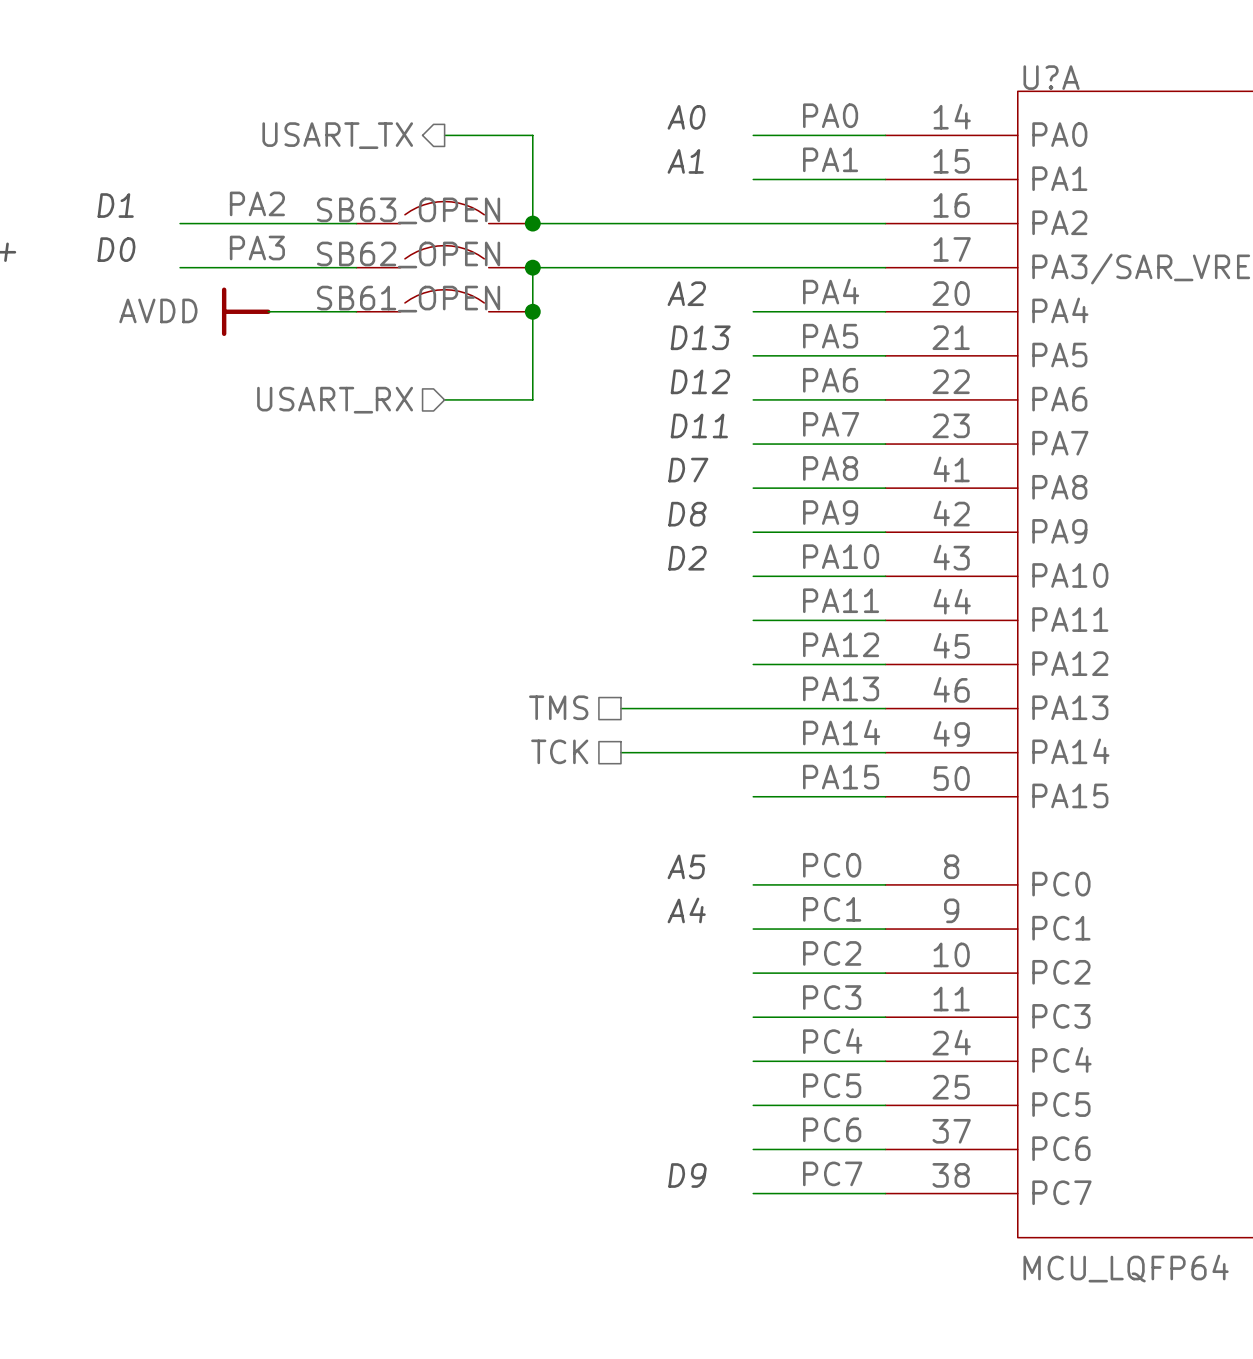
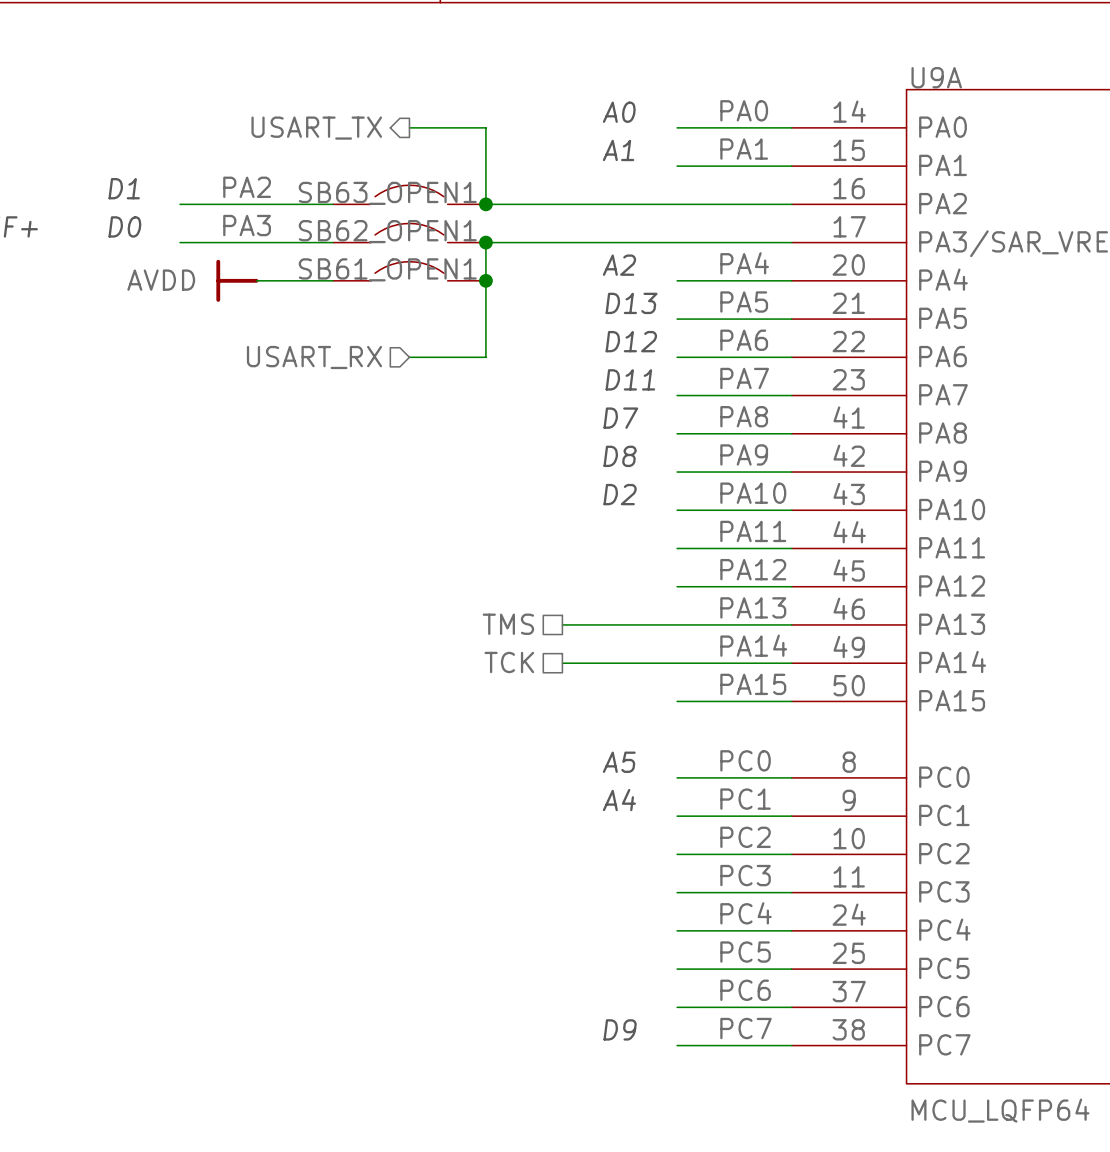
U?A name: U?A (1051, 77) -> U9A (936, 77)
SB63_OPEN name: SB63_OPEN (408, 210) -> SB63_OPEN1 (387, 193)
SB62_OPEN name: SB62_OPEN (408, 255) -> SB62_OPEN1 (387, 231)
SB61_OPEN name: SB61_OPEN (408, 299) -> SB61_OPEN1 (387, 269)

